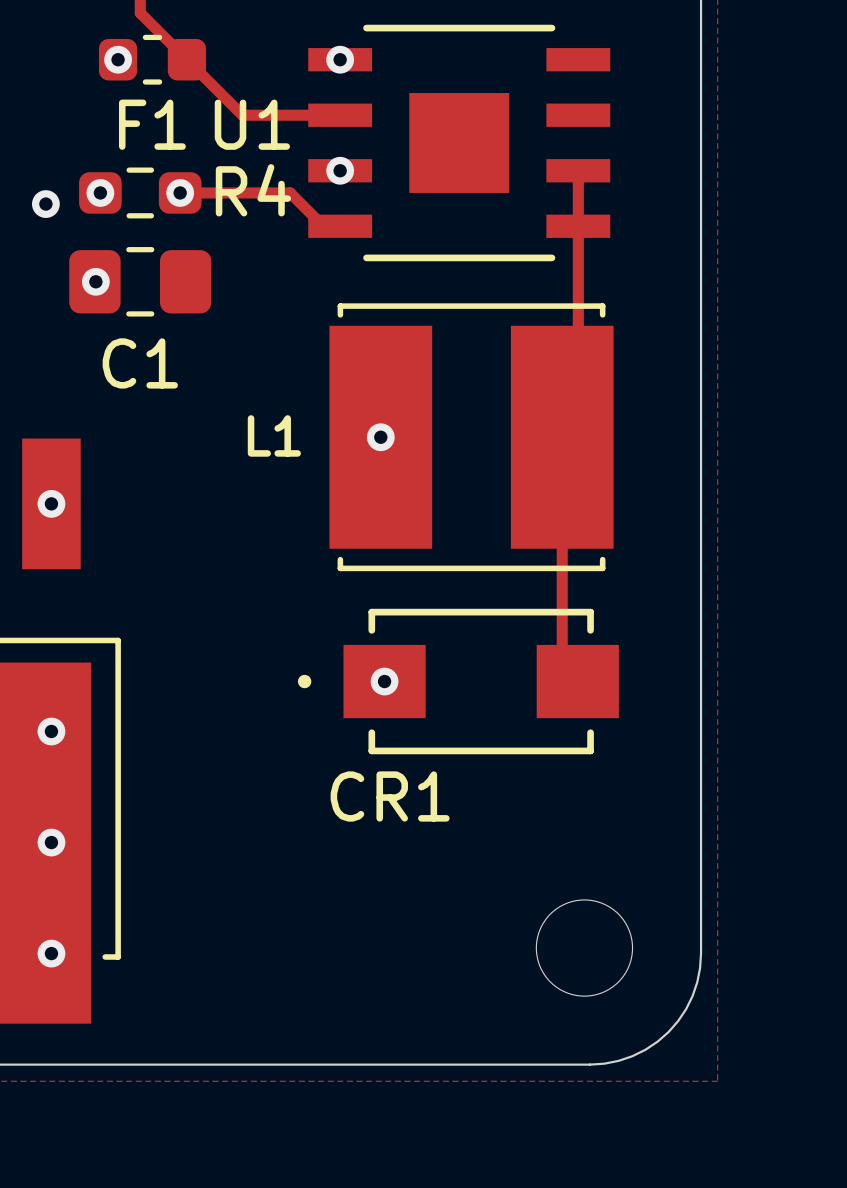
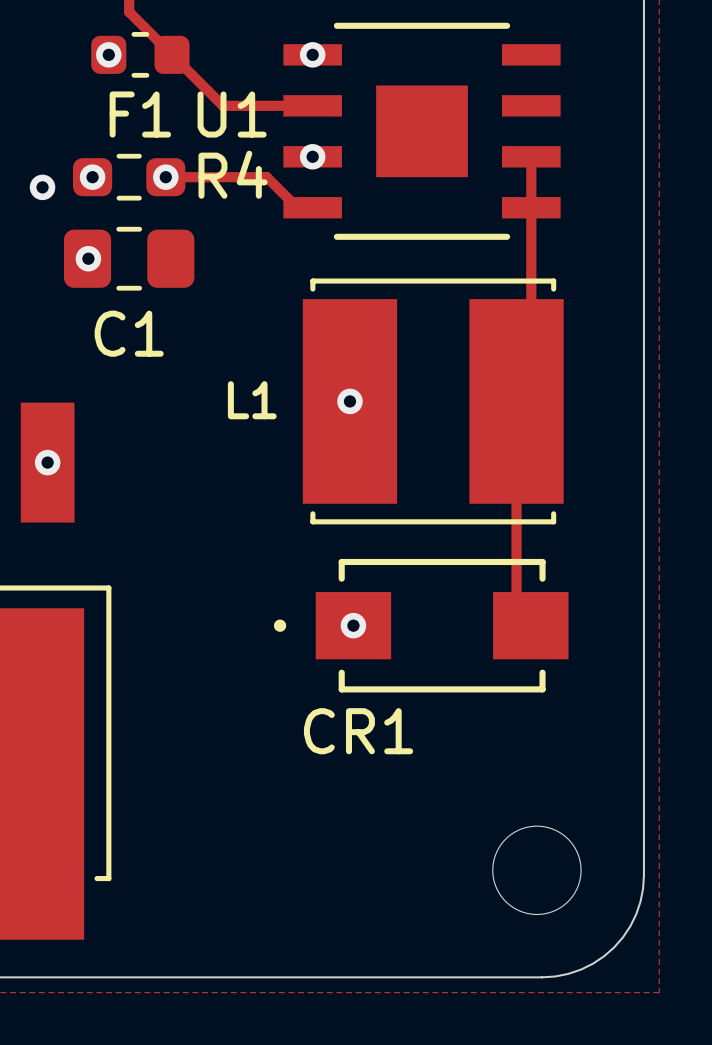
via: (51, 731) -> none
via: (51, 842) -> none
via: (51, 953) -> none

